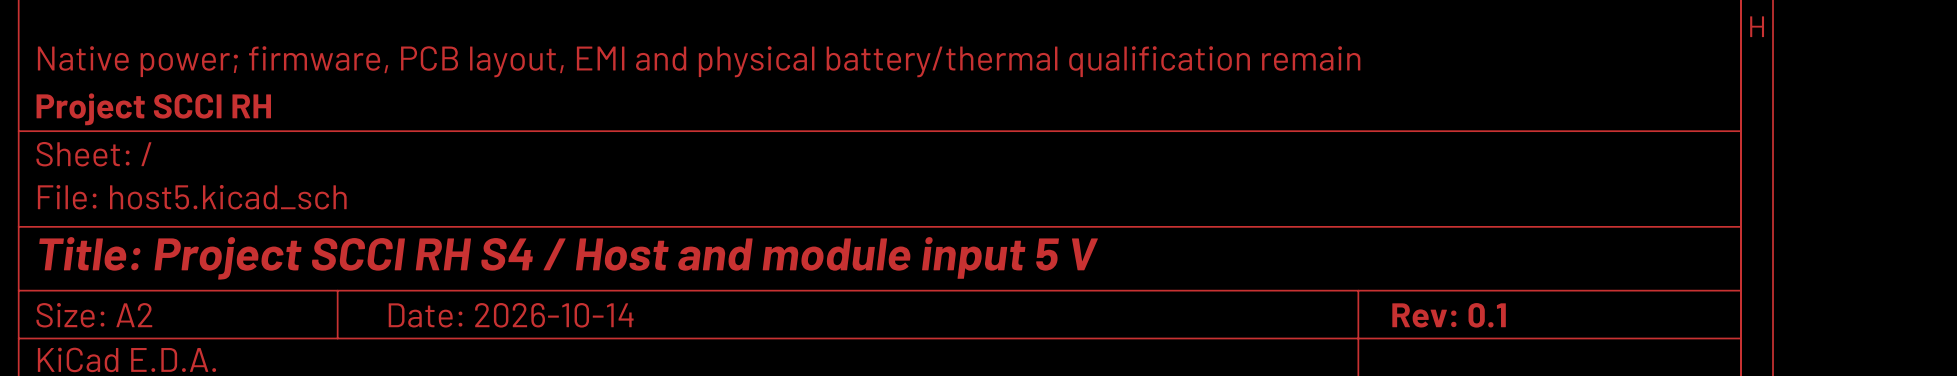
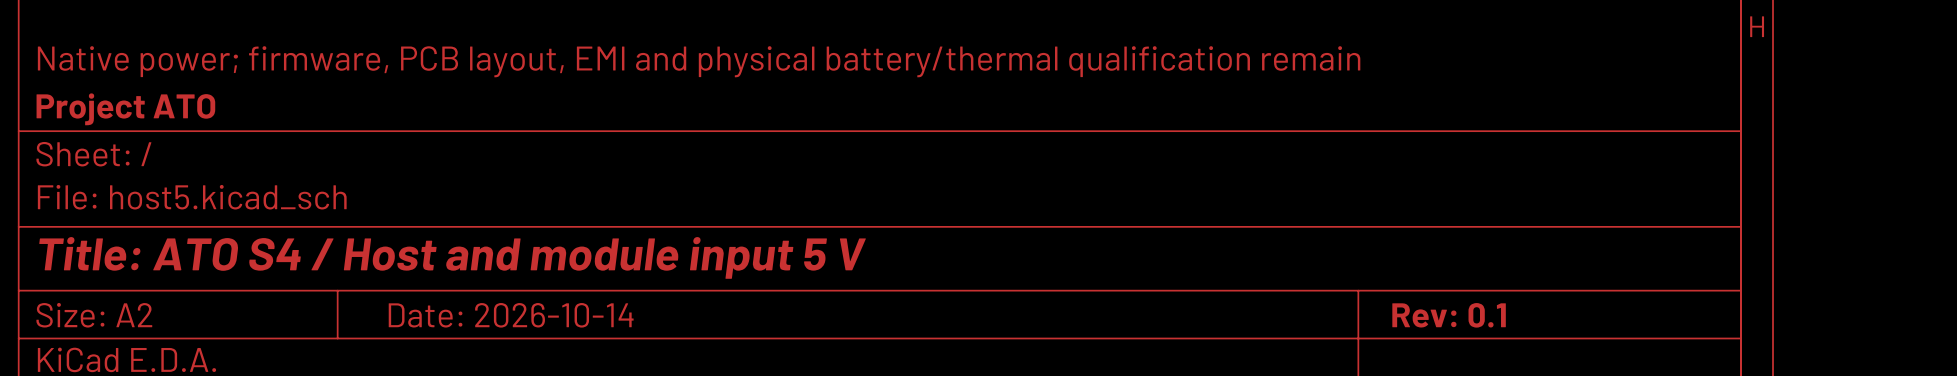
title block: Project SCCI RH (153, 109) -> Project ATO (125, 109)
title block: Title: Project SCCI RH S4 / Host and module input 5 V (568, 258) -> Title: ATO S4 / Host and module input 5 V (452, 257)

